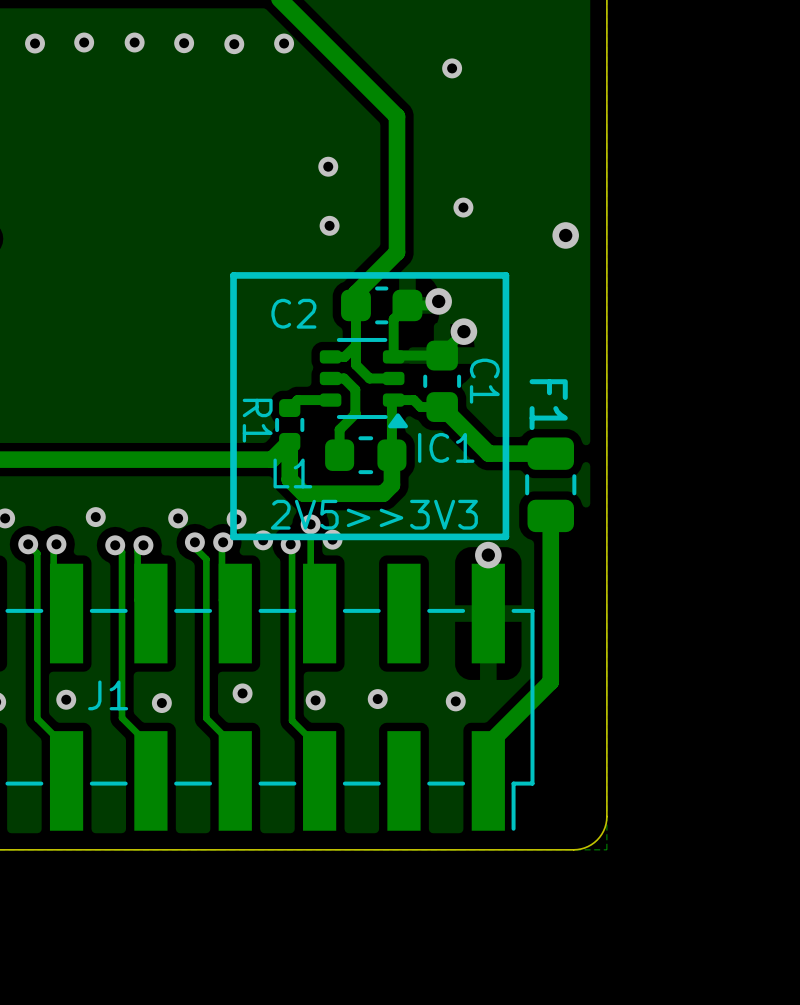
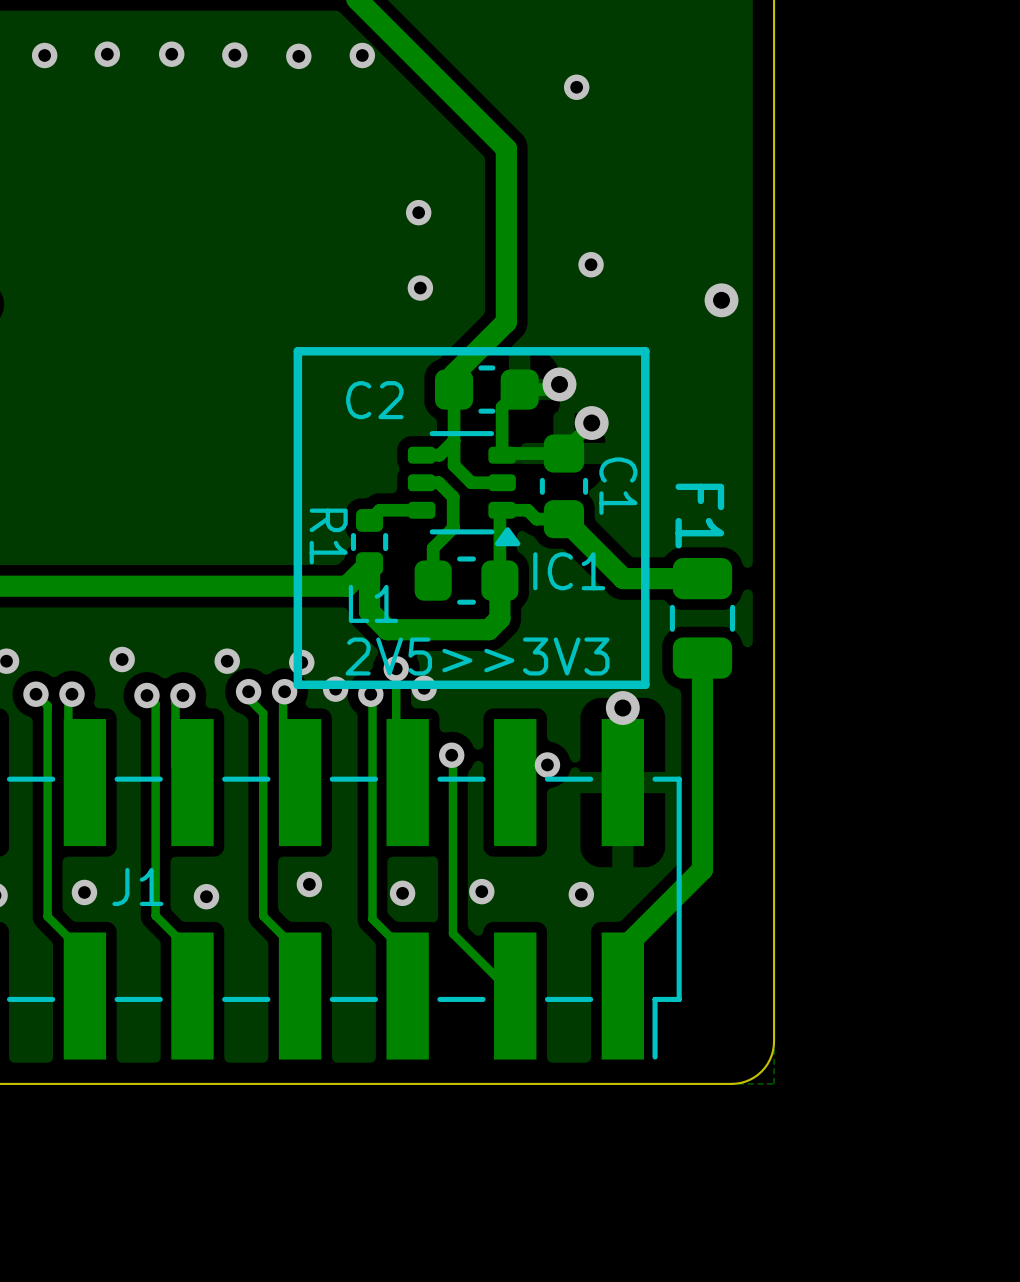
track: none -> (451, 755) (452, 933) (515, 996)
via: none -> (451, 755)
via: none -> (547, 764)

